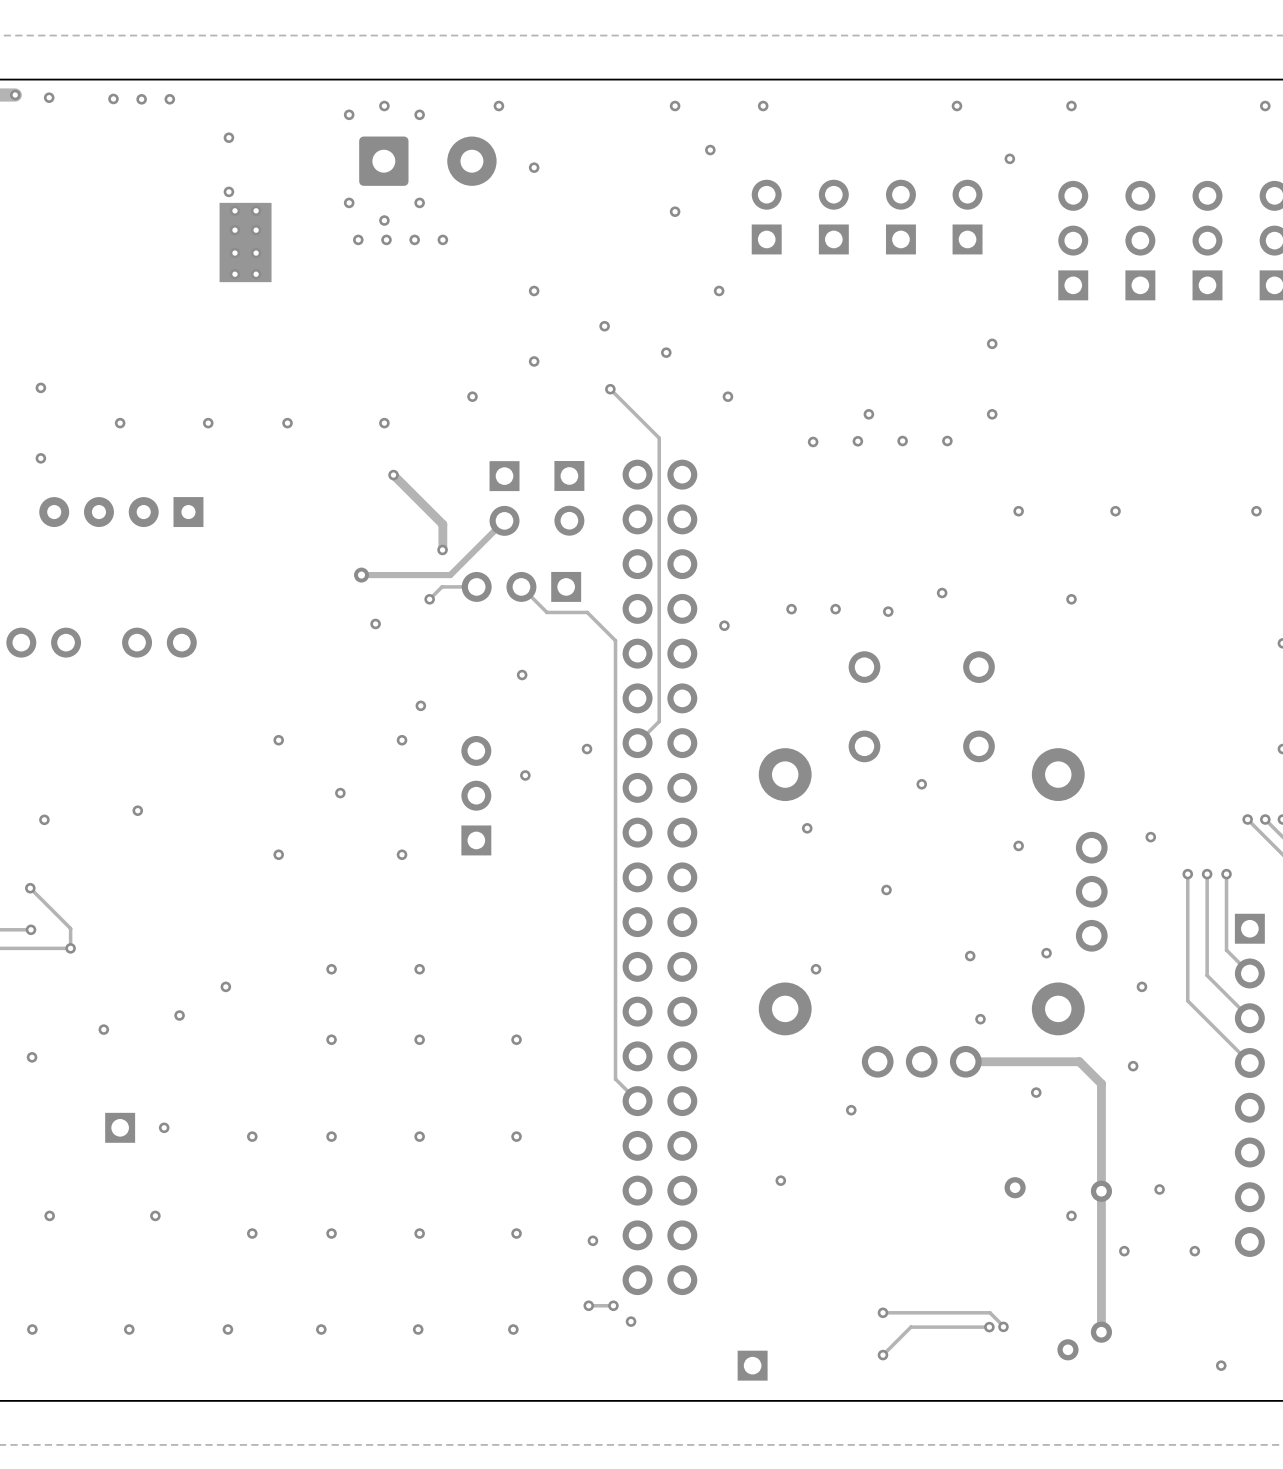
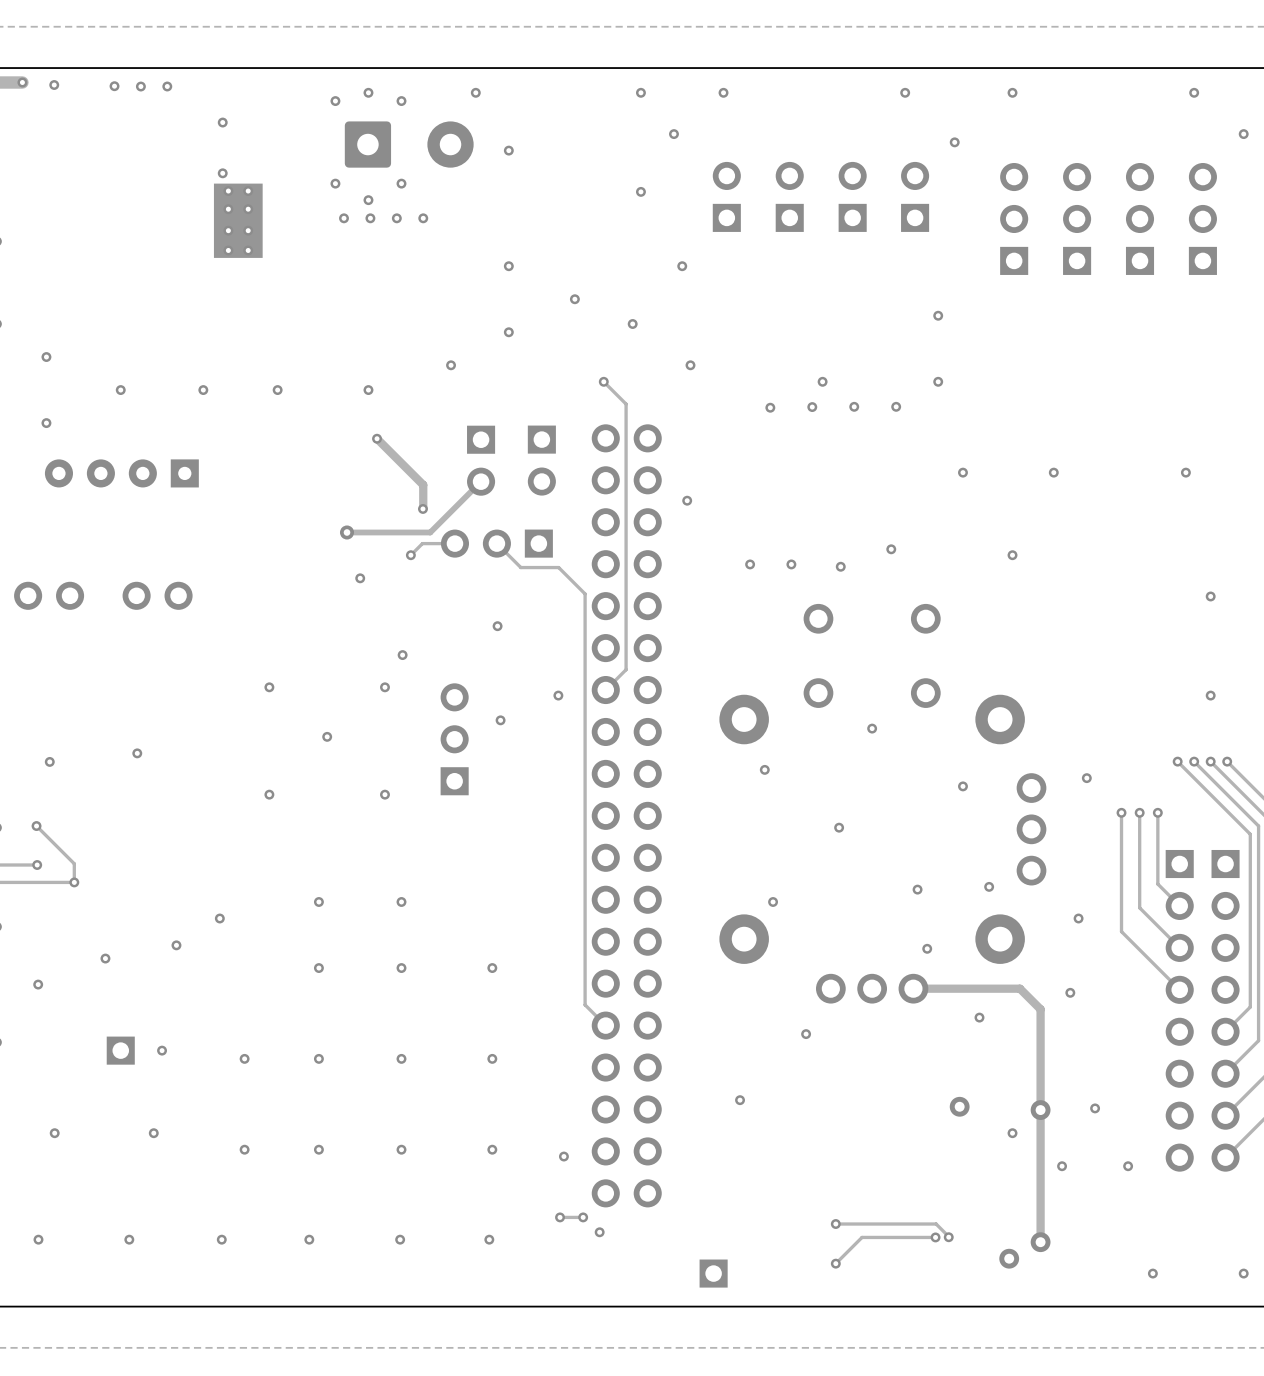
track: (610, 389) (635, 414) -> none
via position: (610, 389) -> (603, 381)
via position: (724, 625) -> (687, 500)

